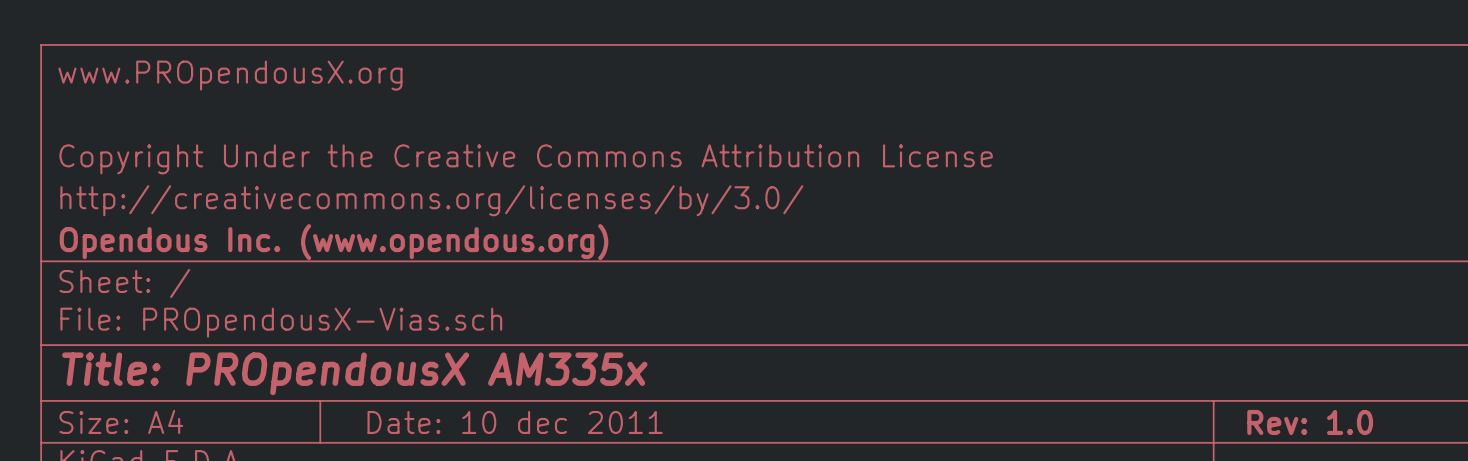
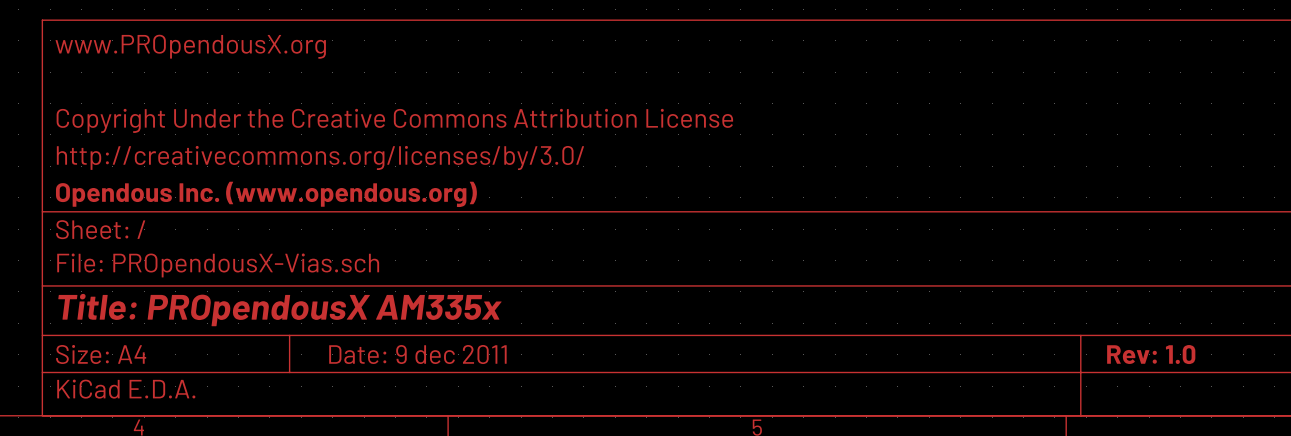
title block: Date: 10 dec 2011 (515, 422) -> Date: 9 dec 2011 (417, 354)

